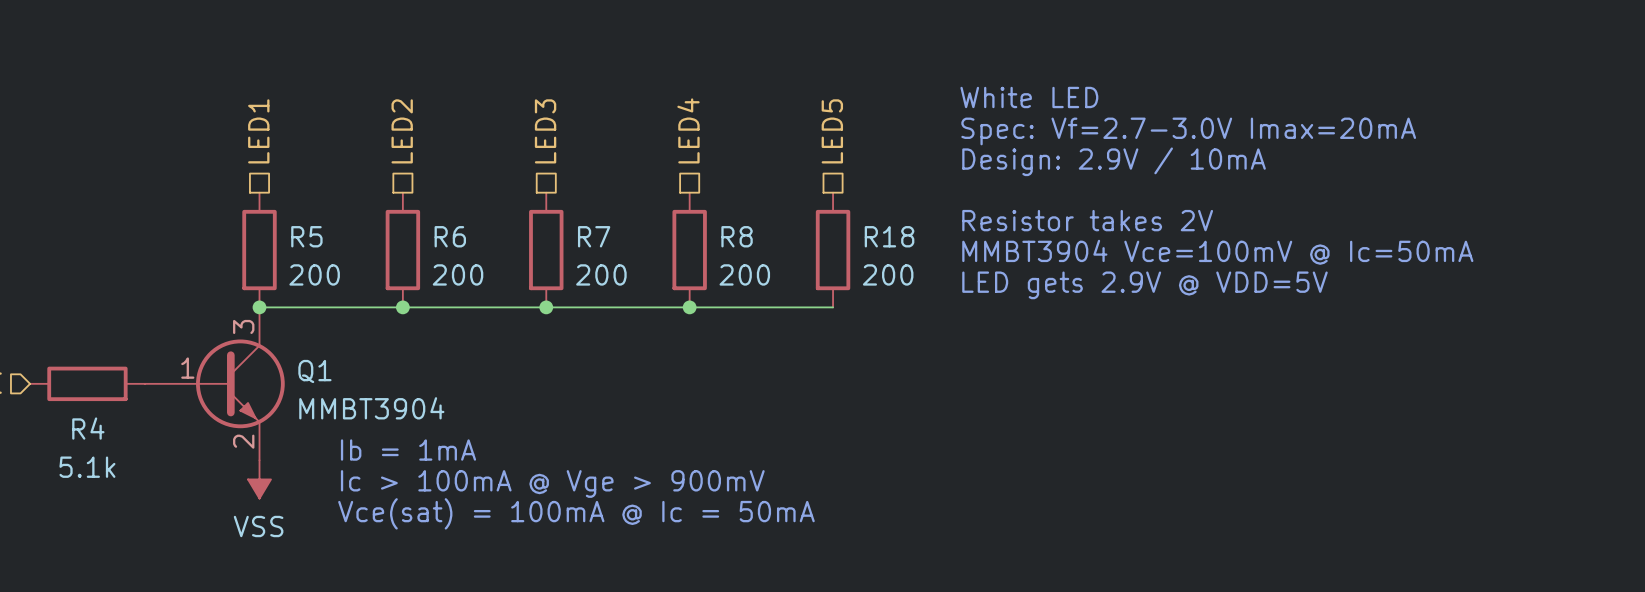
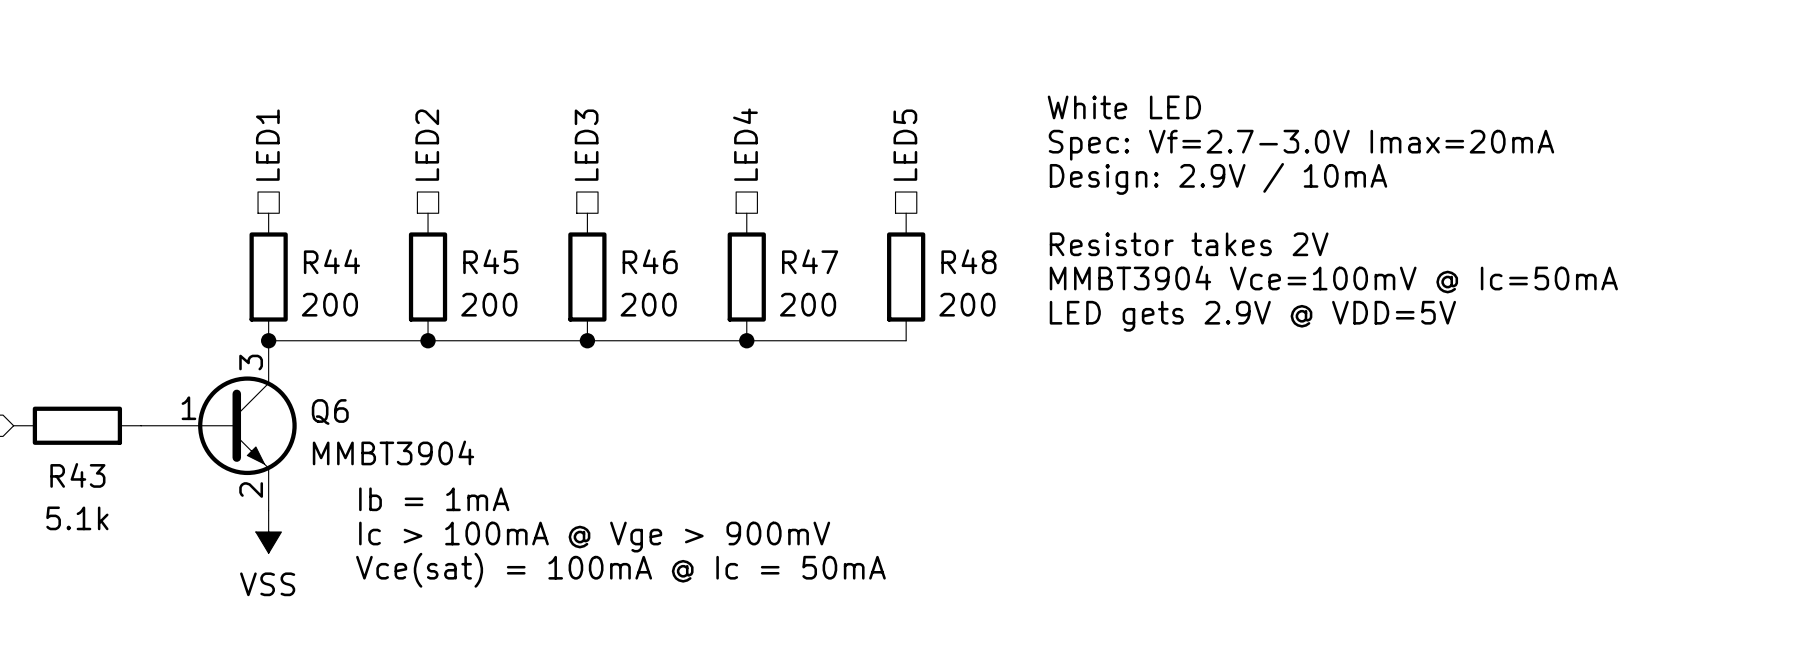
R5 name: R5 (306, 236) -> R44 (331, 261)
R6 name: R6 (450, 236) -> R45 (490, 261)
R7 name: R7 (594, 236) -> R46 (650, 261)
R8 name: R8 (737, 236) -> R47 (810, 261)
R18 name: R18 (889, 236) -> R48 (968, 261)
Q1 name: Q1 (314, 371) -> Q6 (330, 412)
R4 name: R4 (88, 428) -> R43 (77, 475)

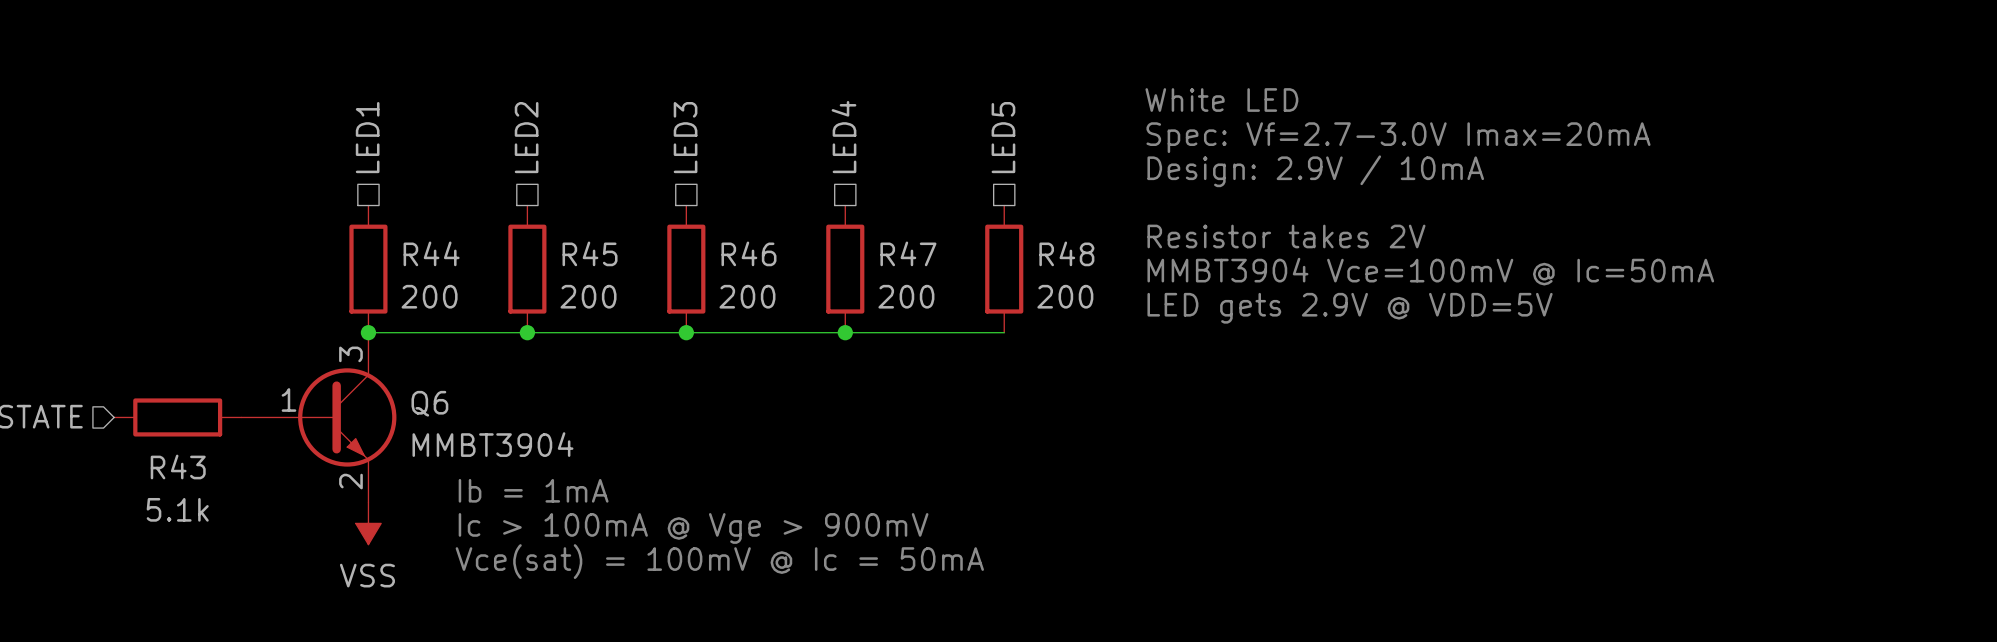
text: Vce(sat) = 100mA @ Ic = 50mA (620, 570) -> Vce(sat) = 100mV @ Ic = 50mA (719, 561)

